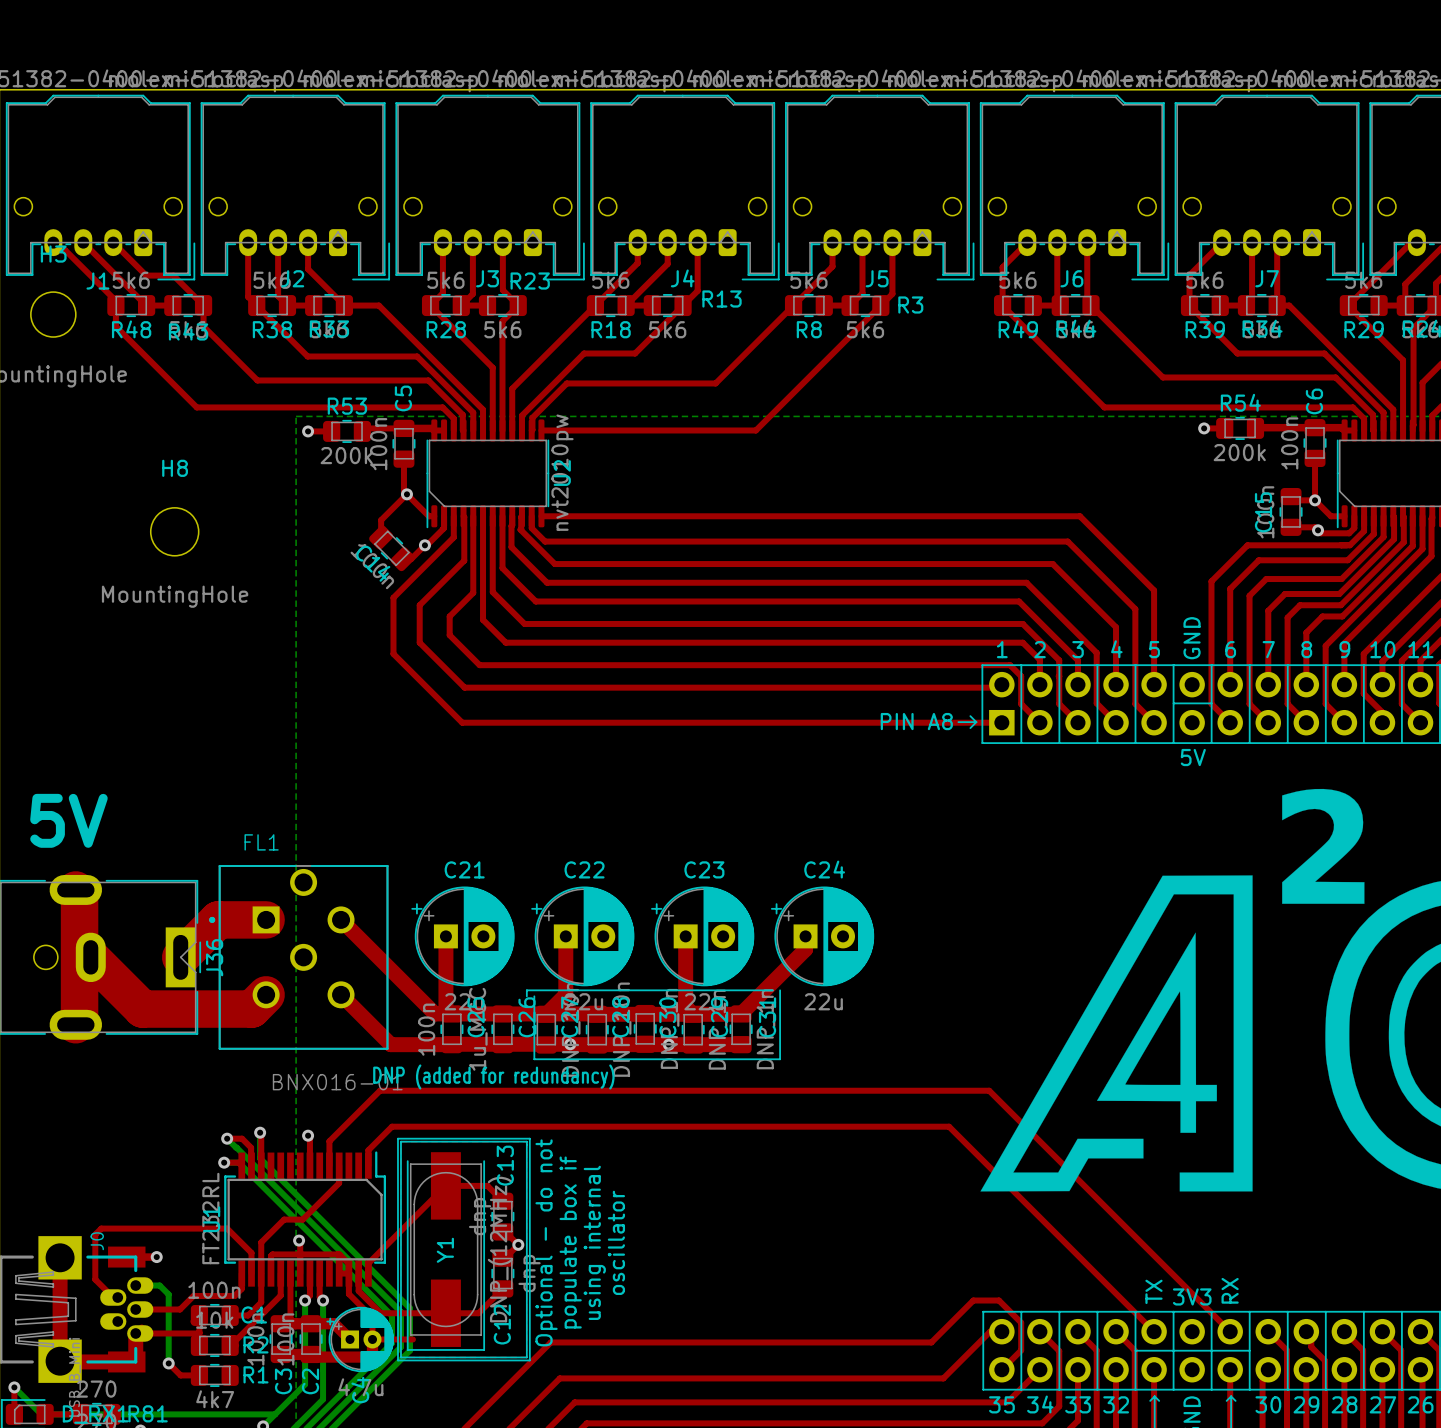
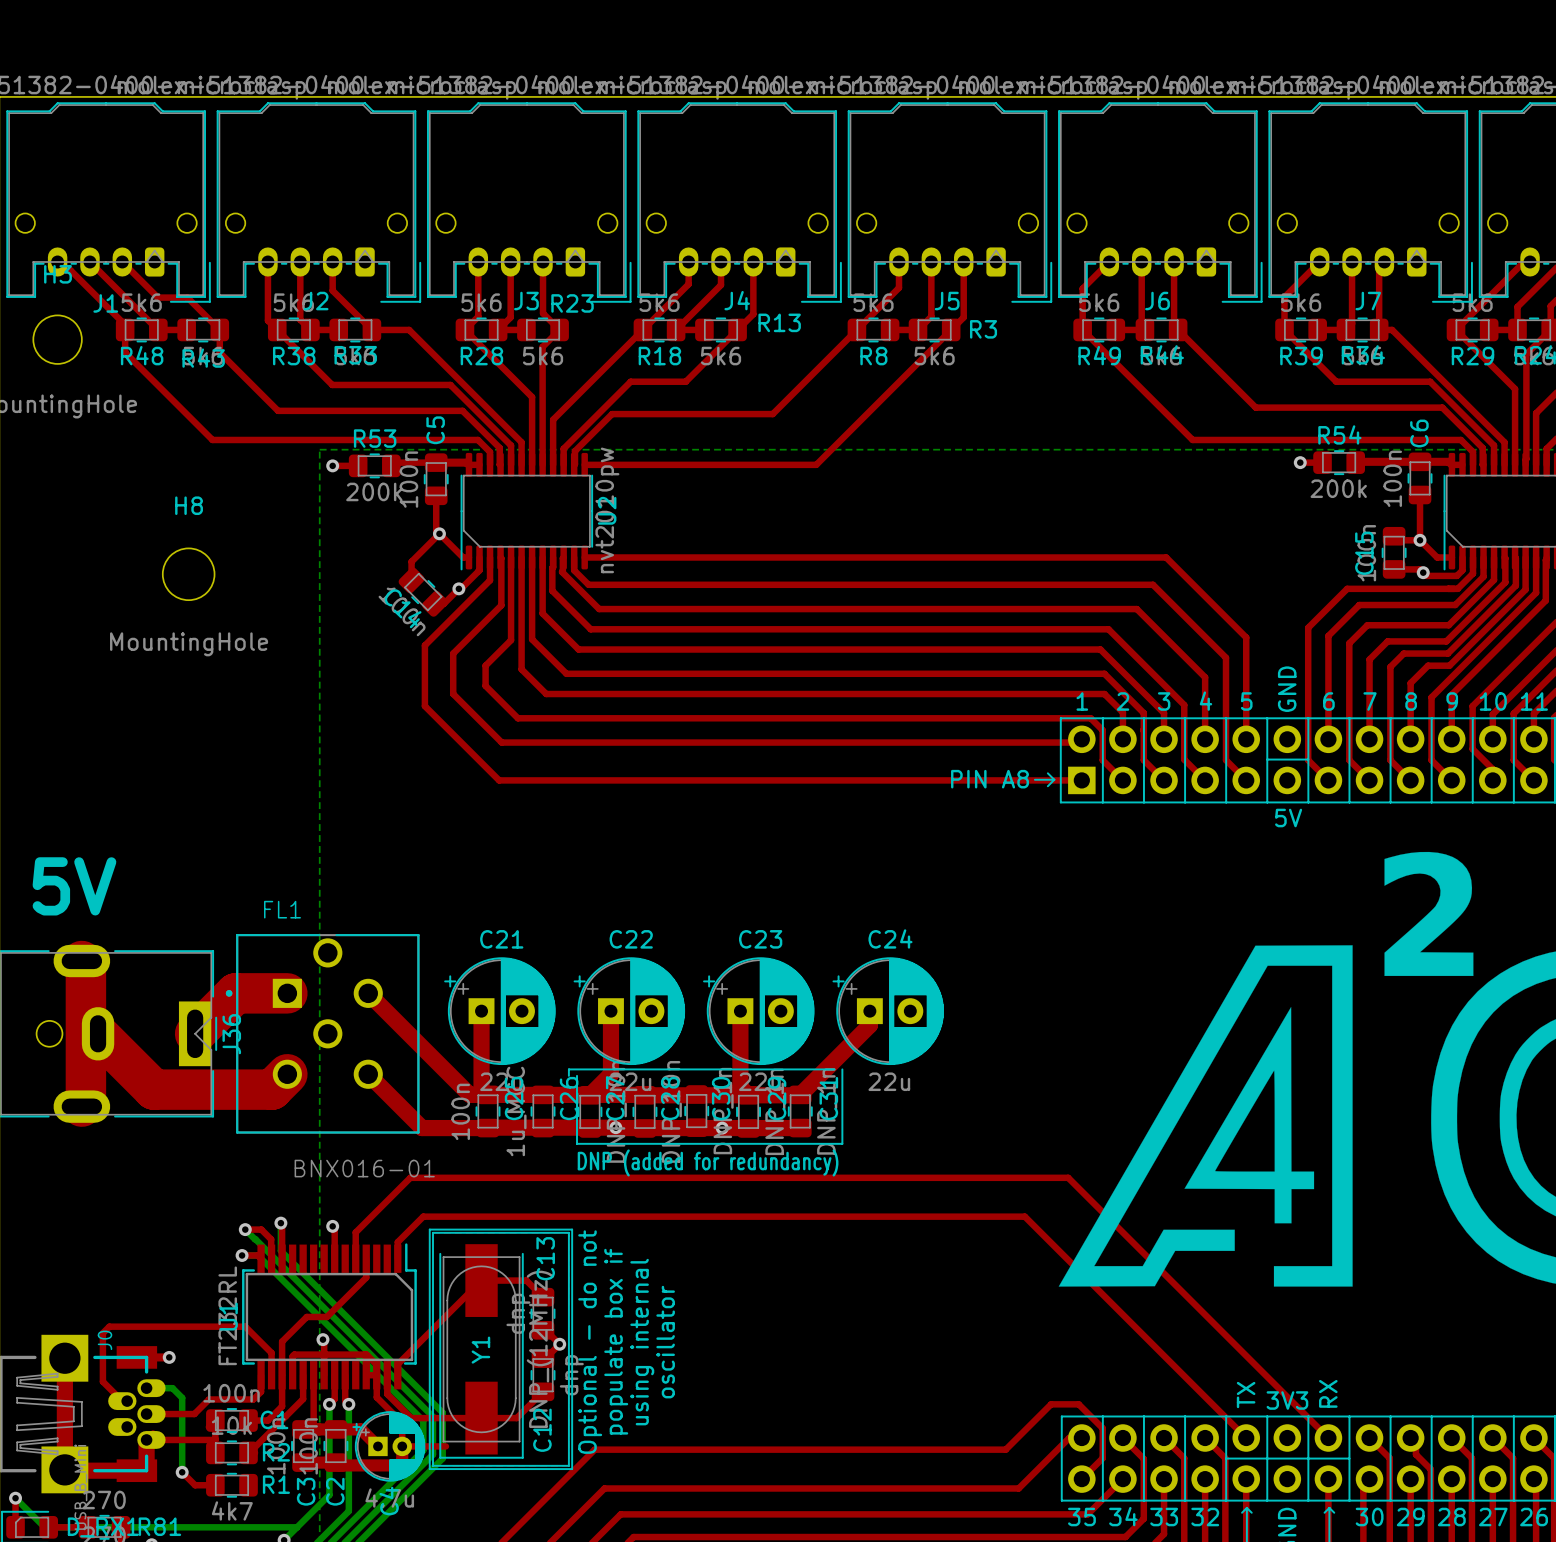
text position: DNP (added for redundancy) (493, 1076) -> DNP (added for redundancy) (708, 1162)

